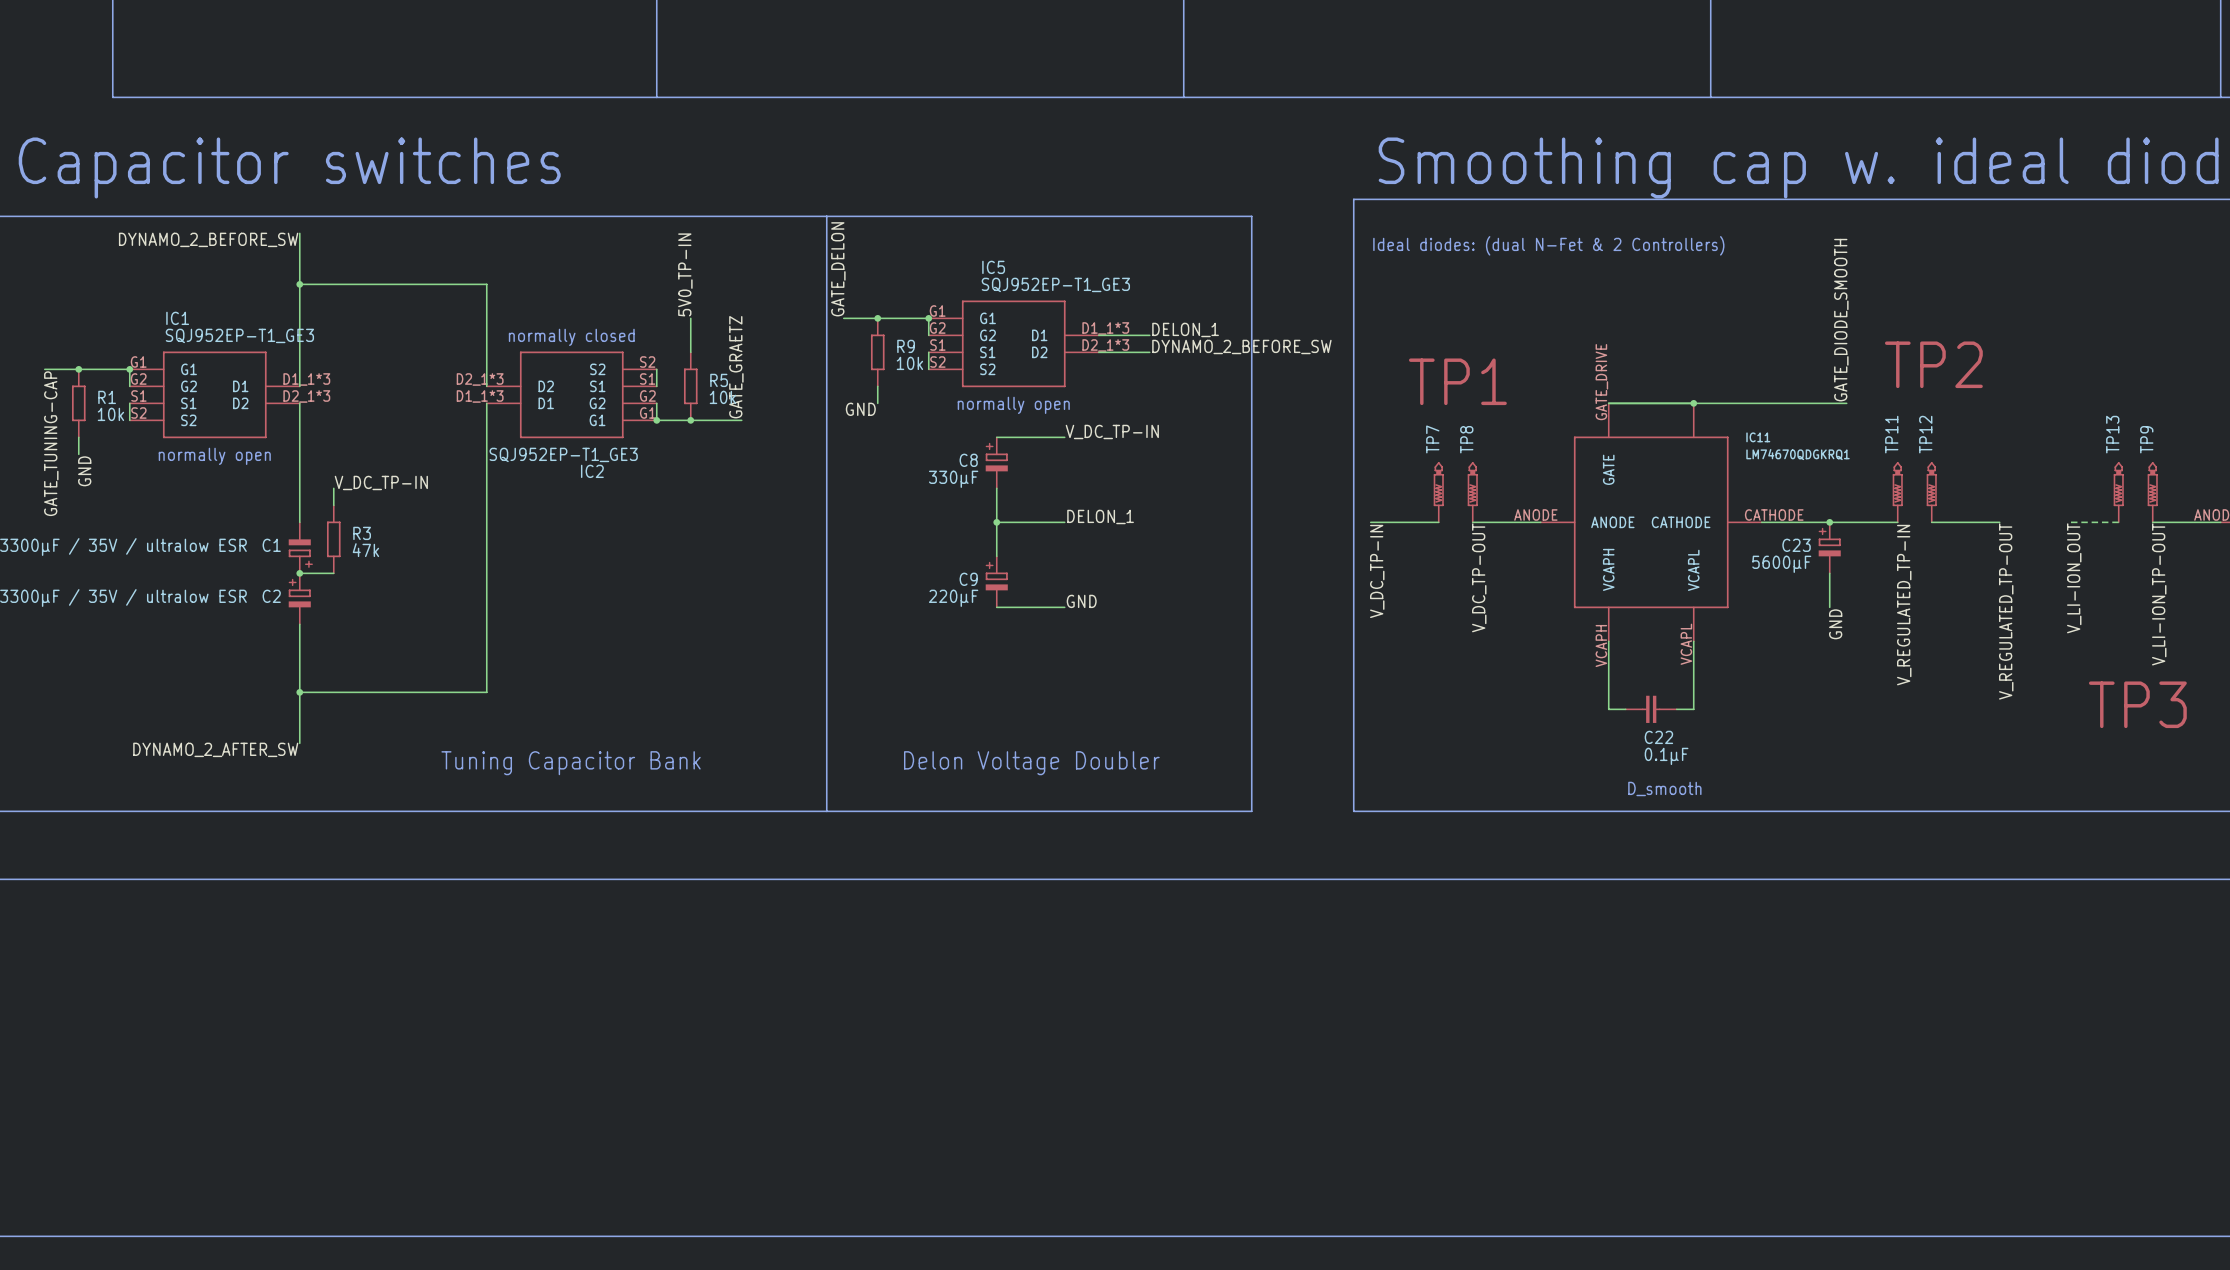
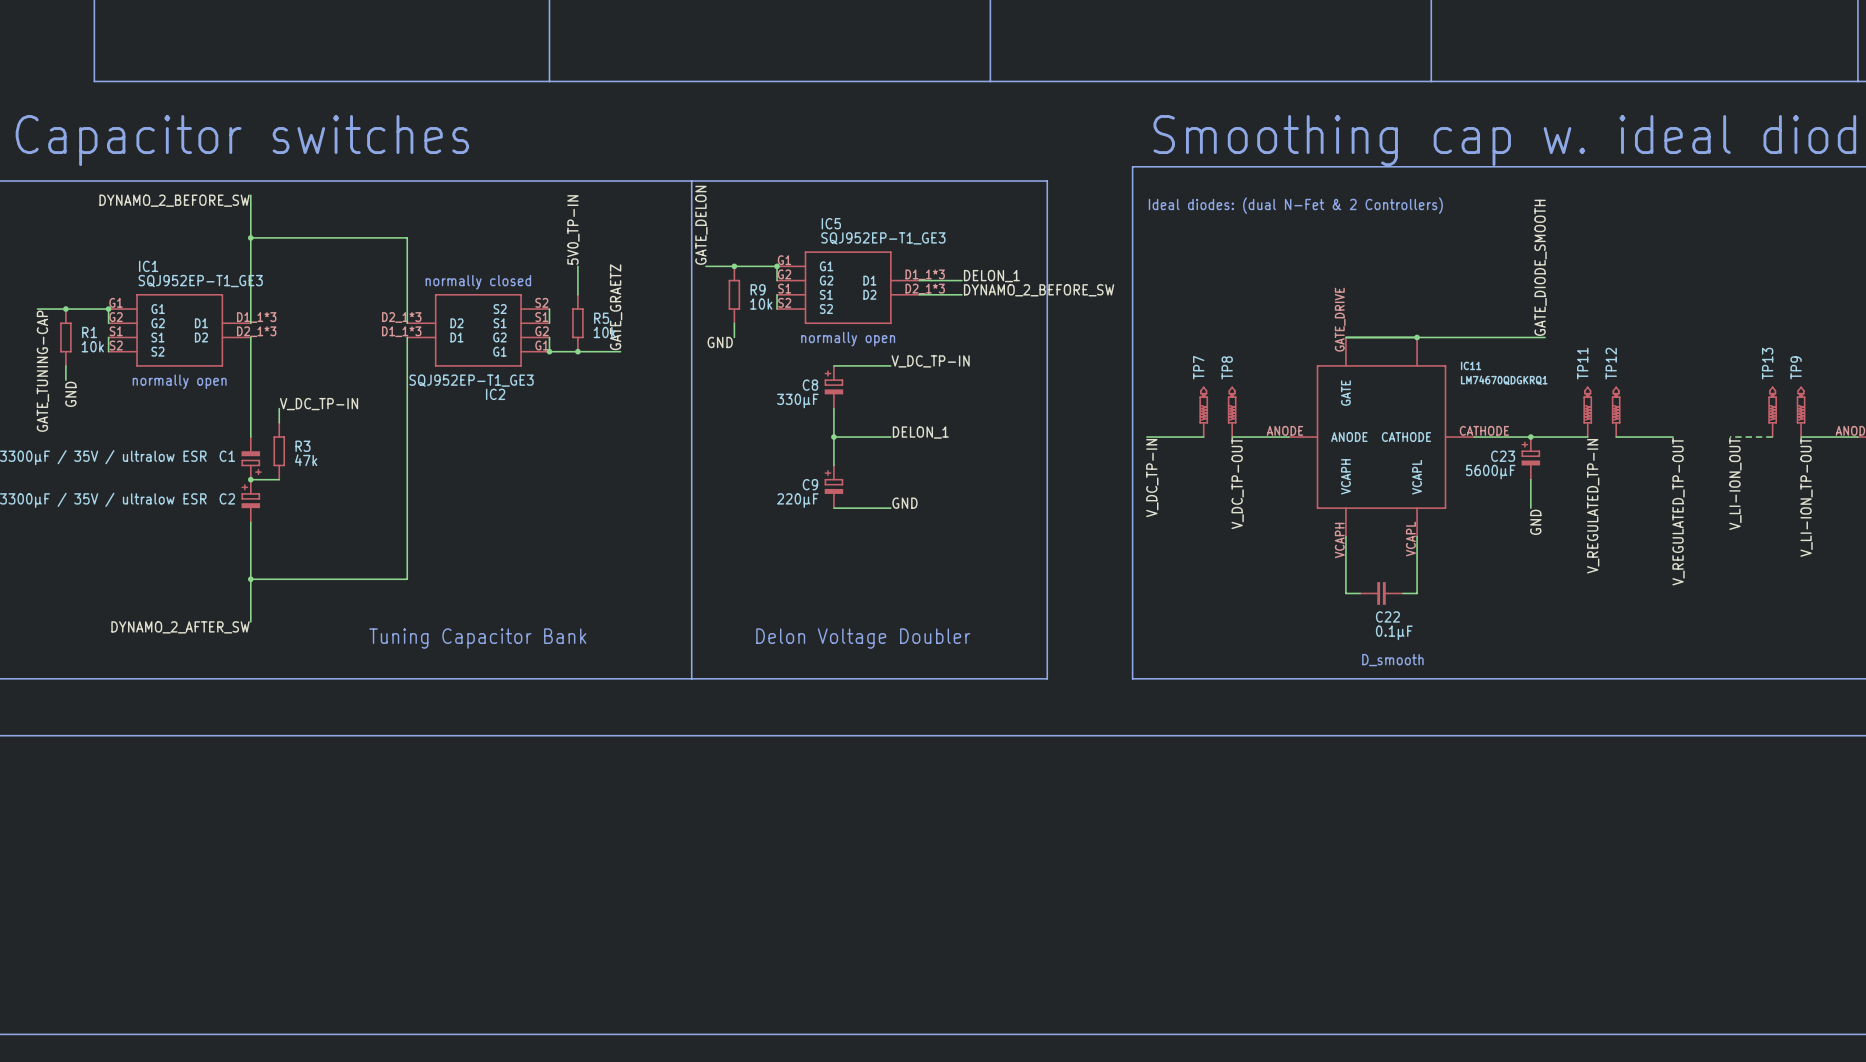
text: TP2 (1933, 364) -> none
text: TP1 (1457, 381) -> none
text: TP3 (2137, 704) -> none

